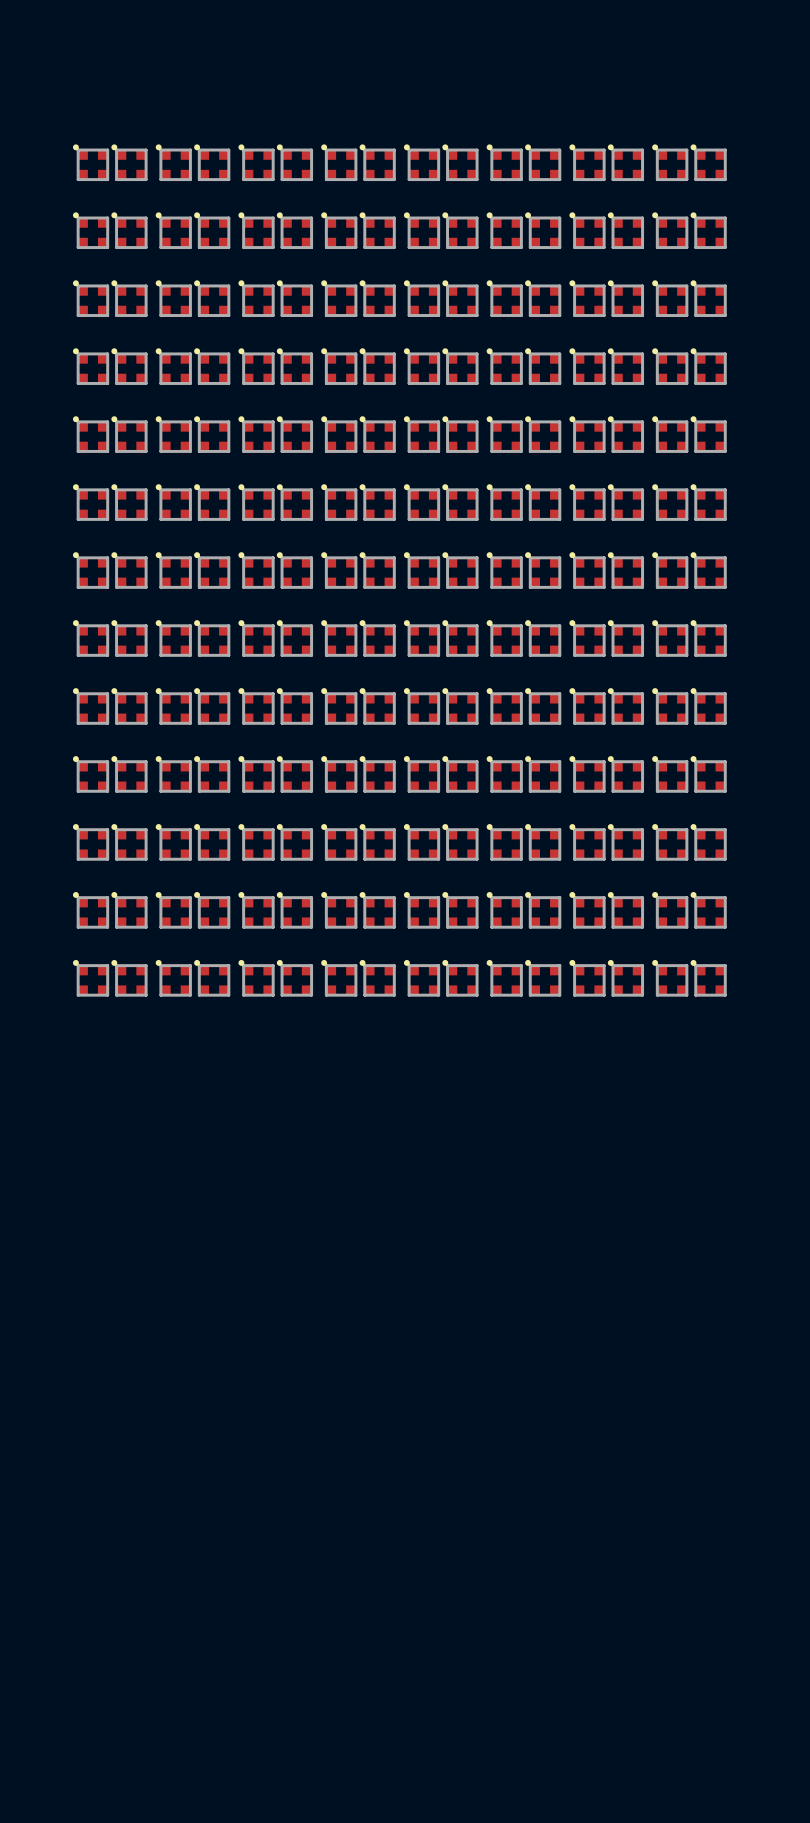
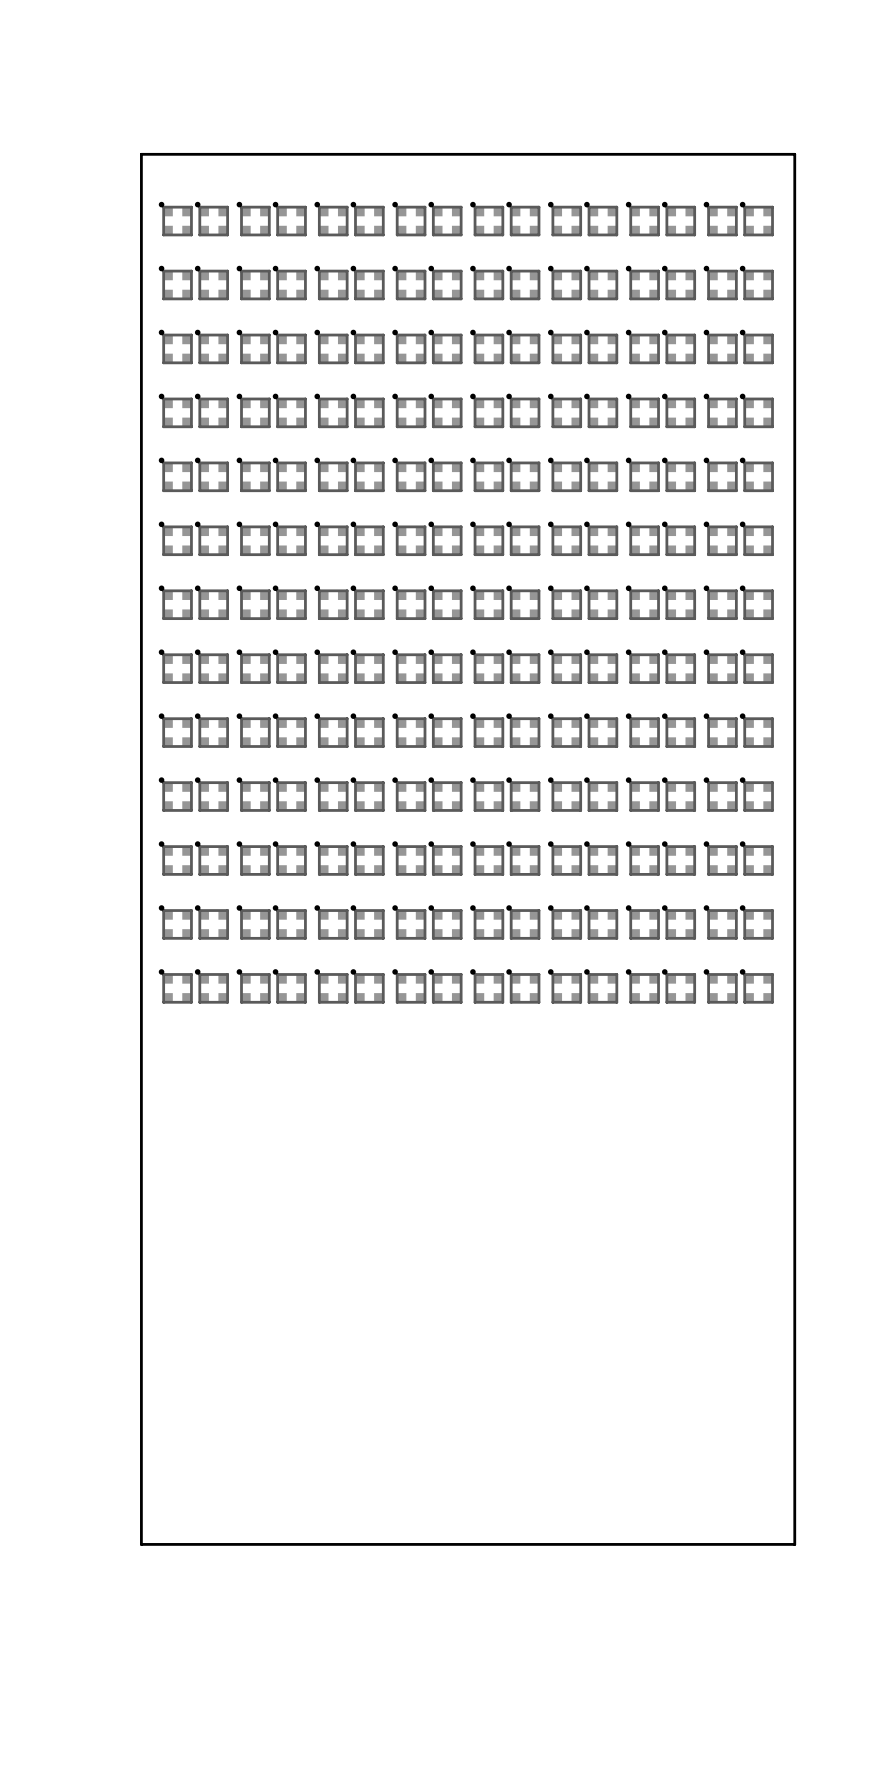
board edge: none -> (141, 154) (794, 154) (794, 1544) (141, 1544) (141, 154)

